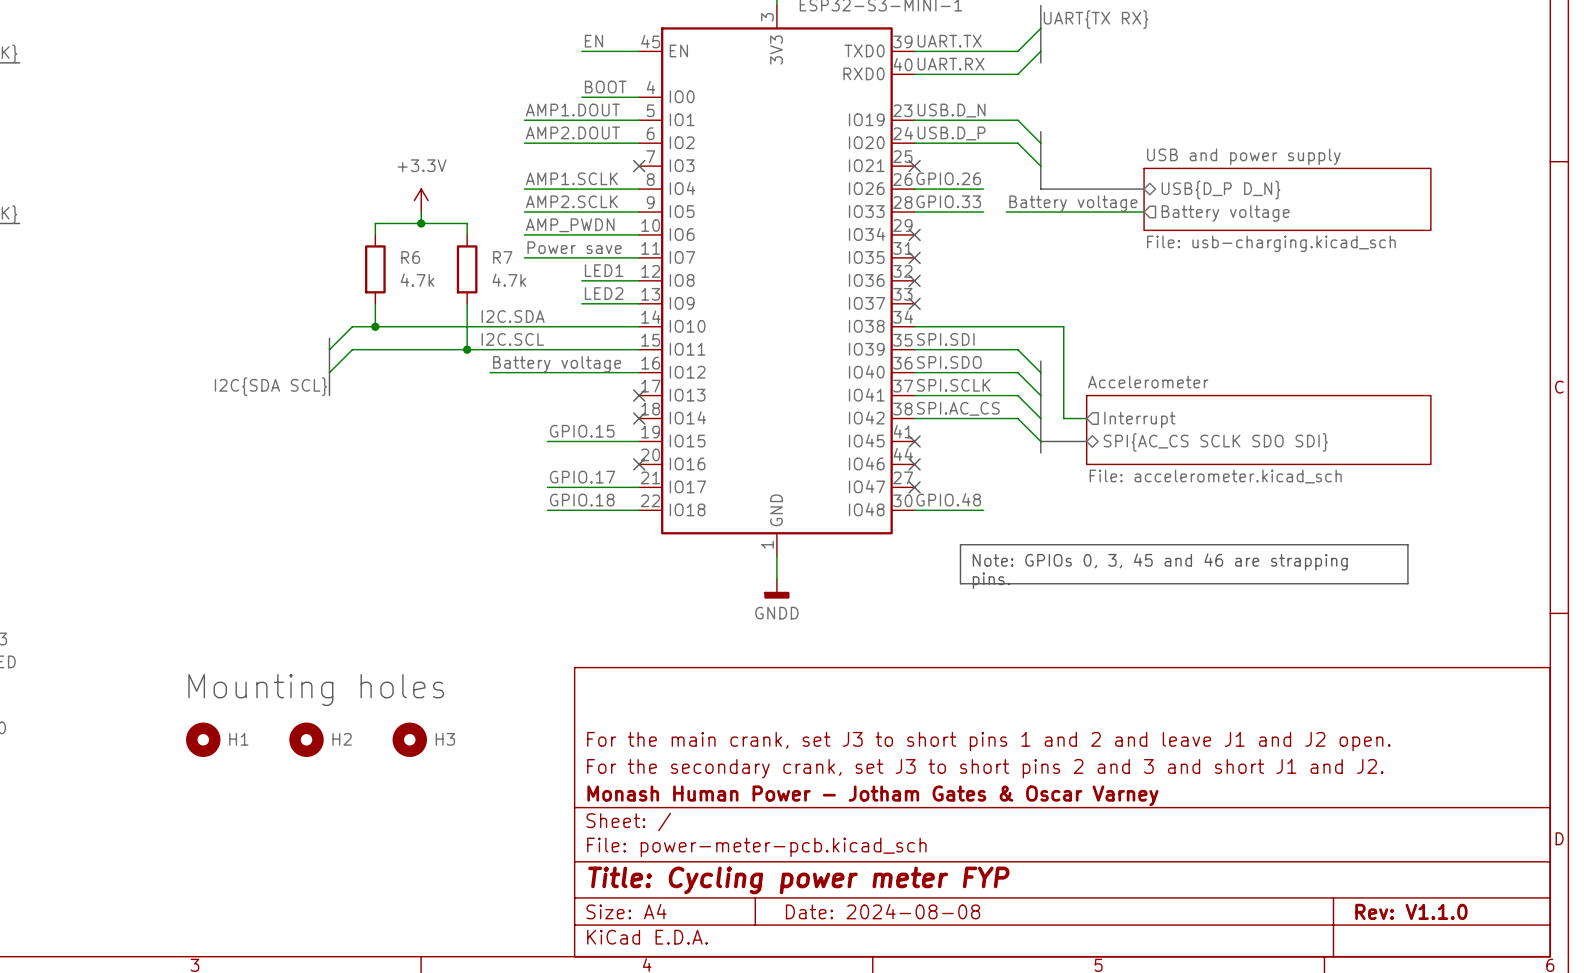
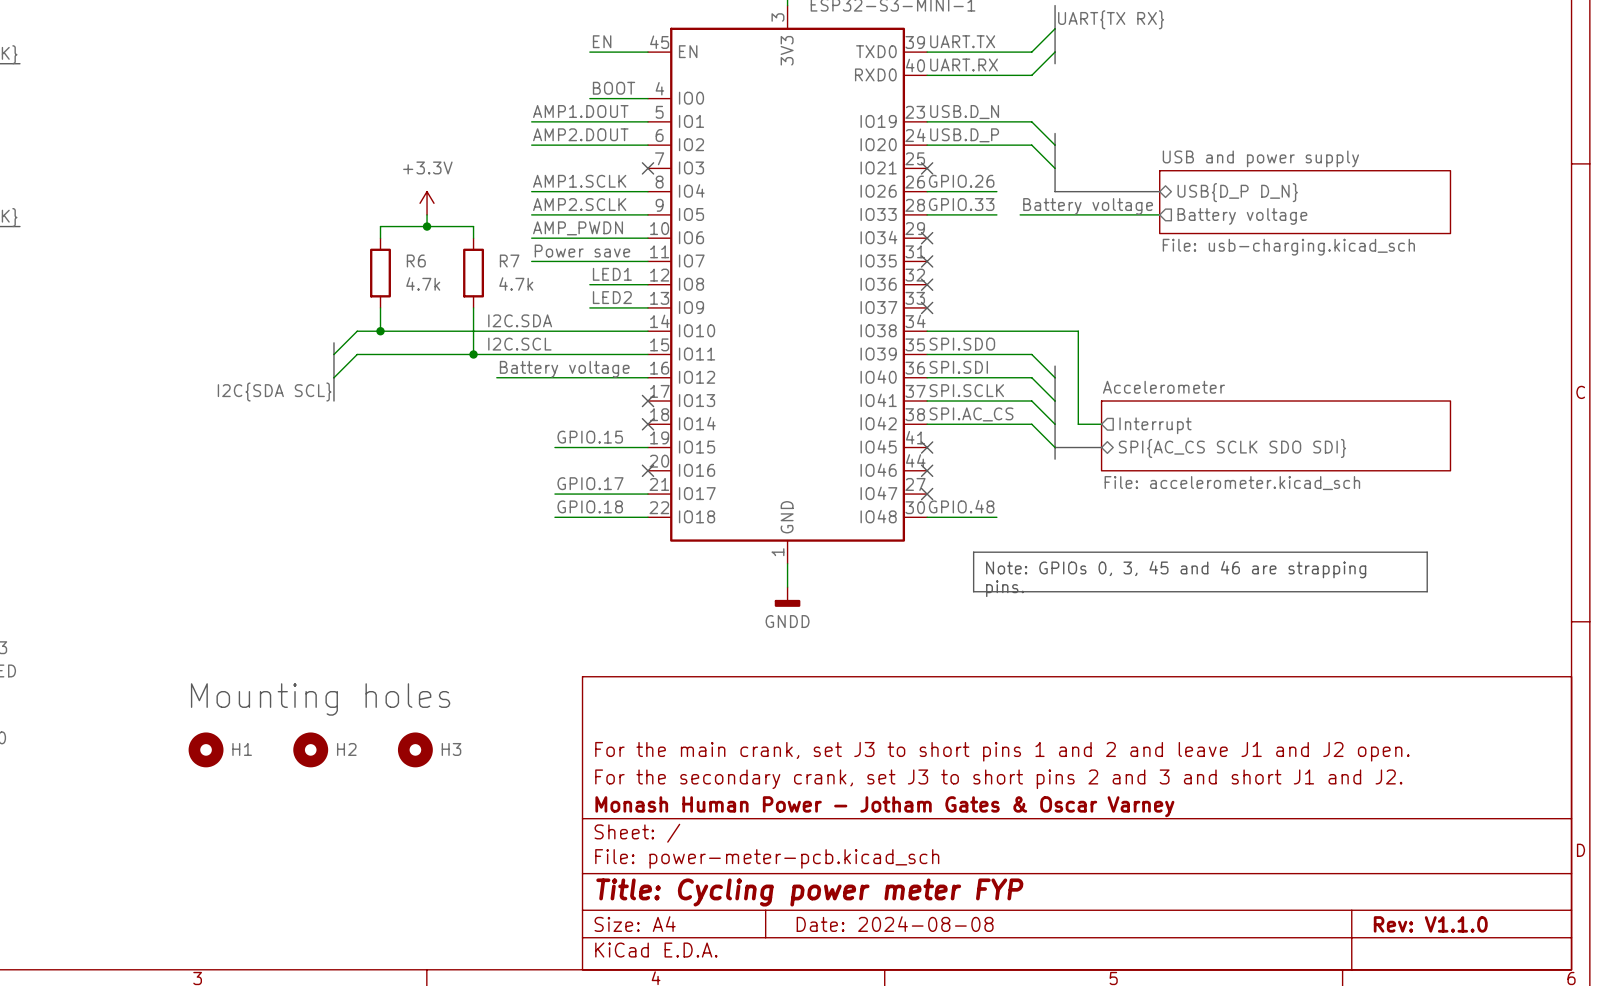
label: SPI.SDI (945, 339) -> SPI.SDO (962, 344)
label: SPI.SDO (949, 362) -> SPI.SDI (958, 367)

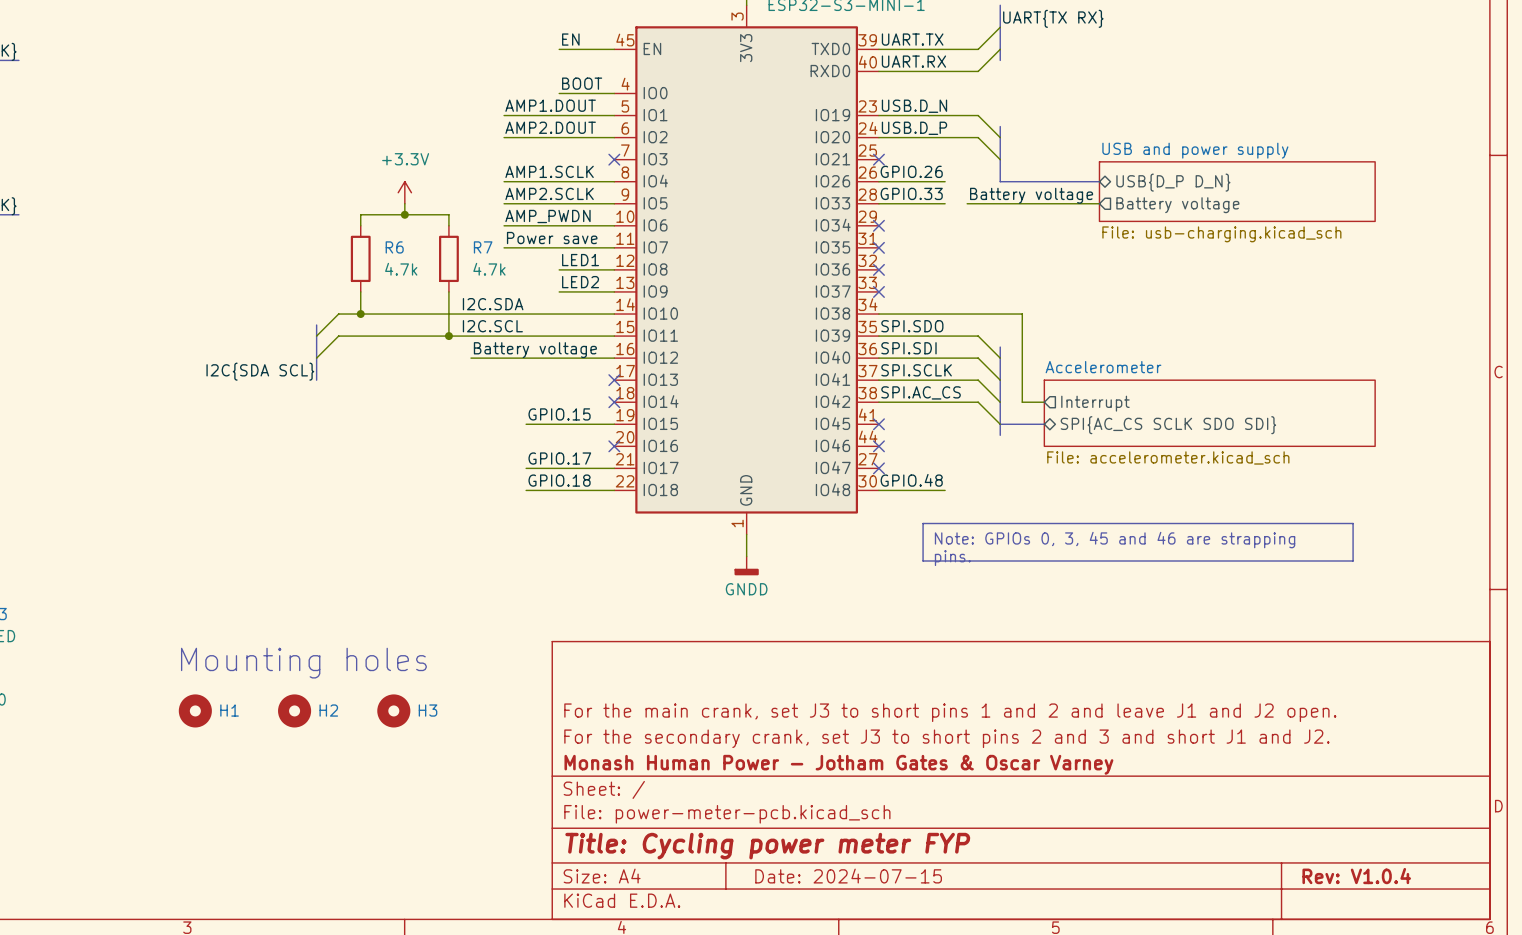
title block: Date: 2024-08-08 (895, 924) -> Date: 2024-07-15 (848, 876)
title block: Rev: V1.1.0 (1430, 924) -> Rev: V1.0.4 (1356, 876)

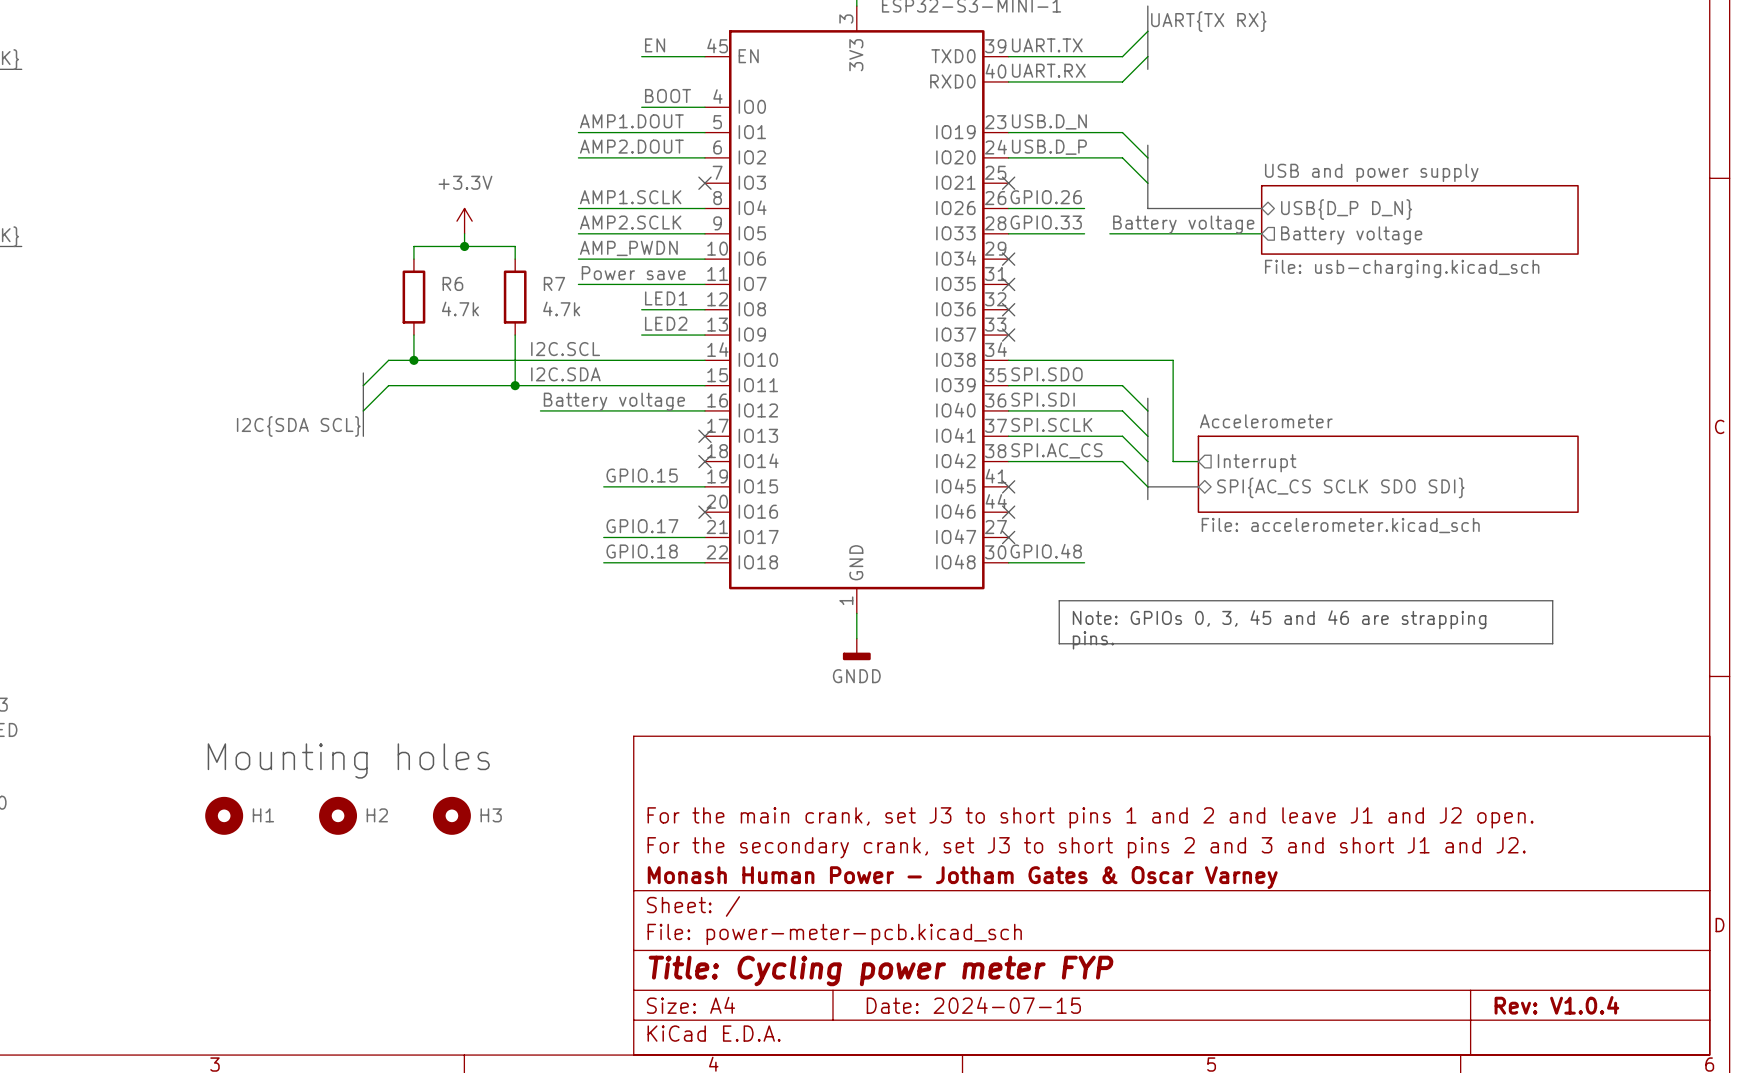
label: I2C.SDA (493, 304) -> I2C.SCL (565, 349)
label: I2C.SCL (492, 326) -> I2C.SDA (565, 374)

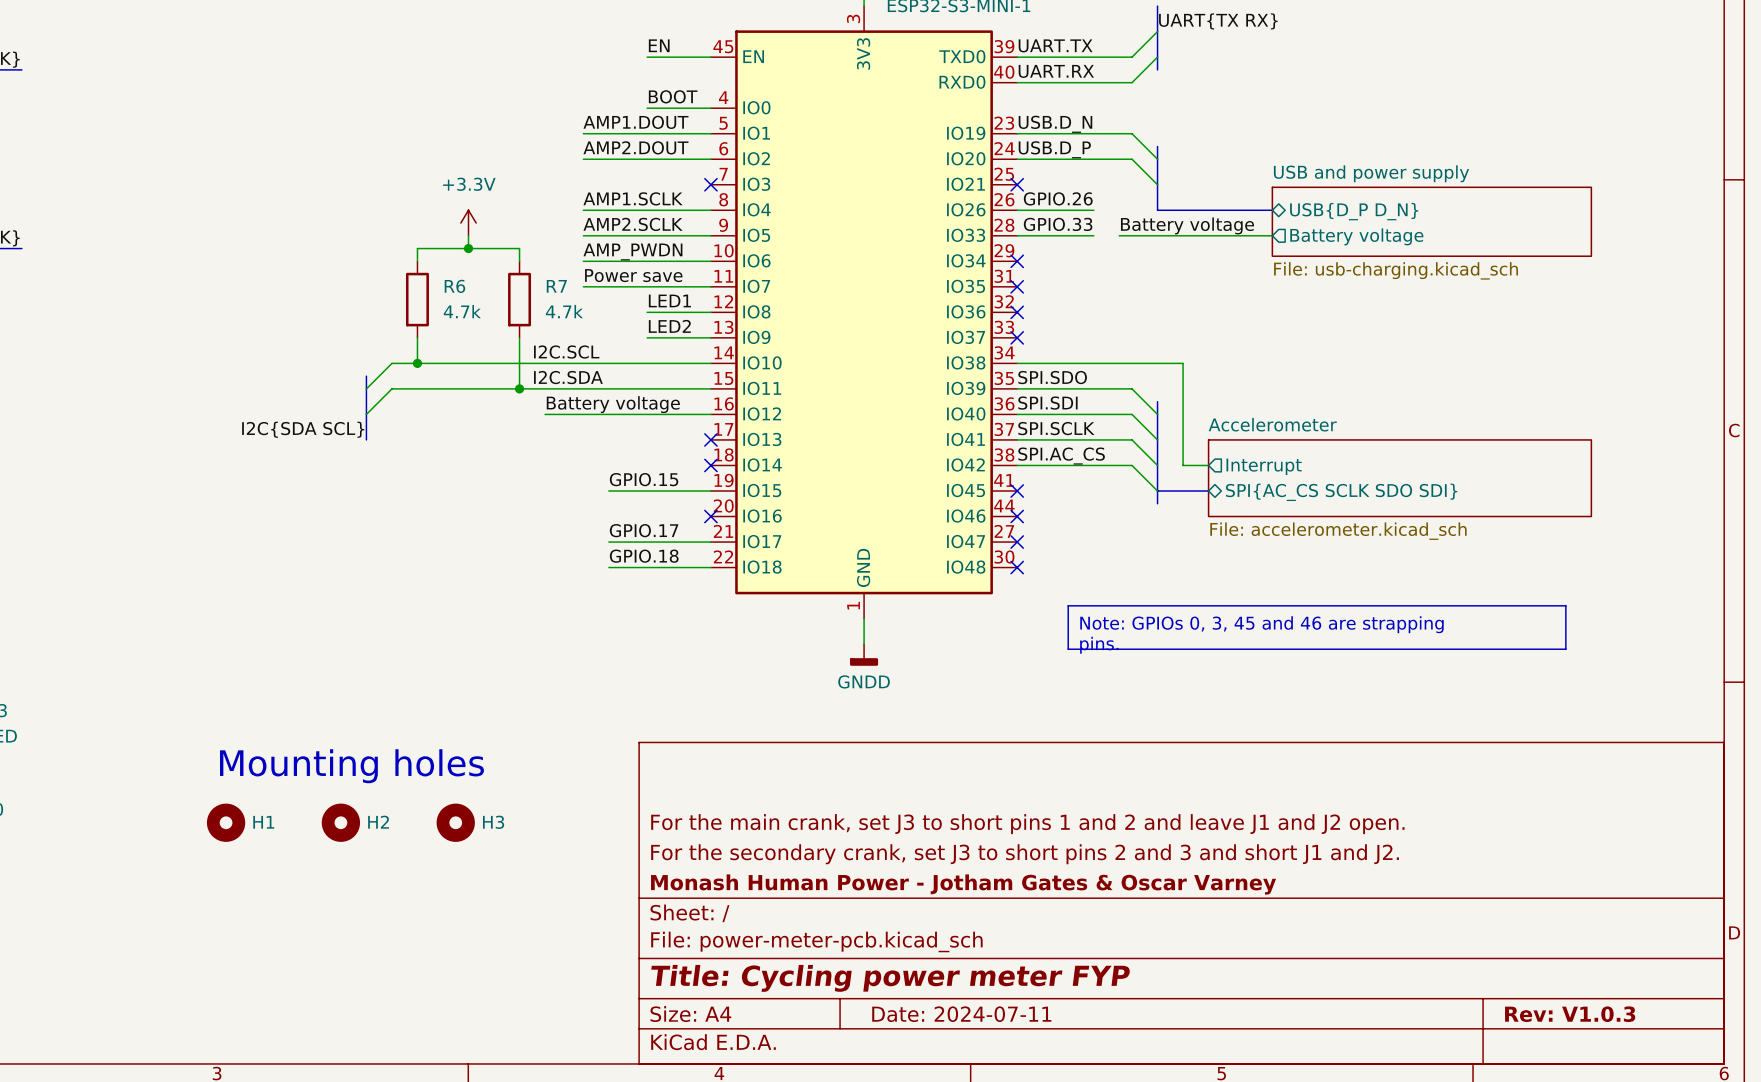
label: GPIO.48 (1046, 551) -> none
wire: (1008, 562) (1084, 562) -> none
no-connect mark: none -> (1017, 567)
title block: Date: 2024-07-15 (973, 1005) -> Date: 2024-07-11 (961, 1014)
title block: Rev: V1.0.4 (1556, 1005) -> Rev: V1.0.3 (1570, 1014)

